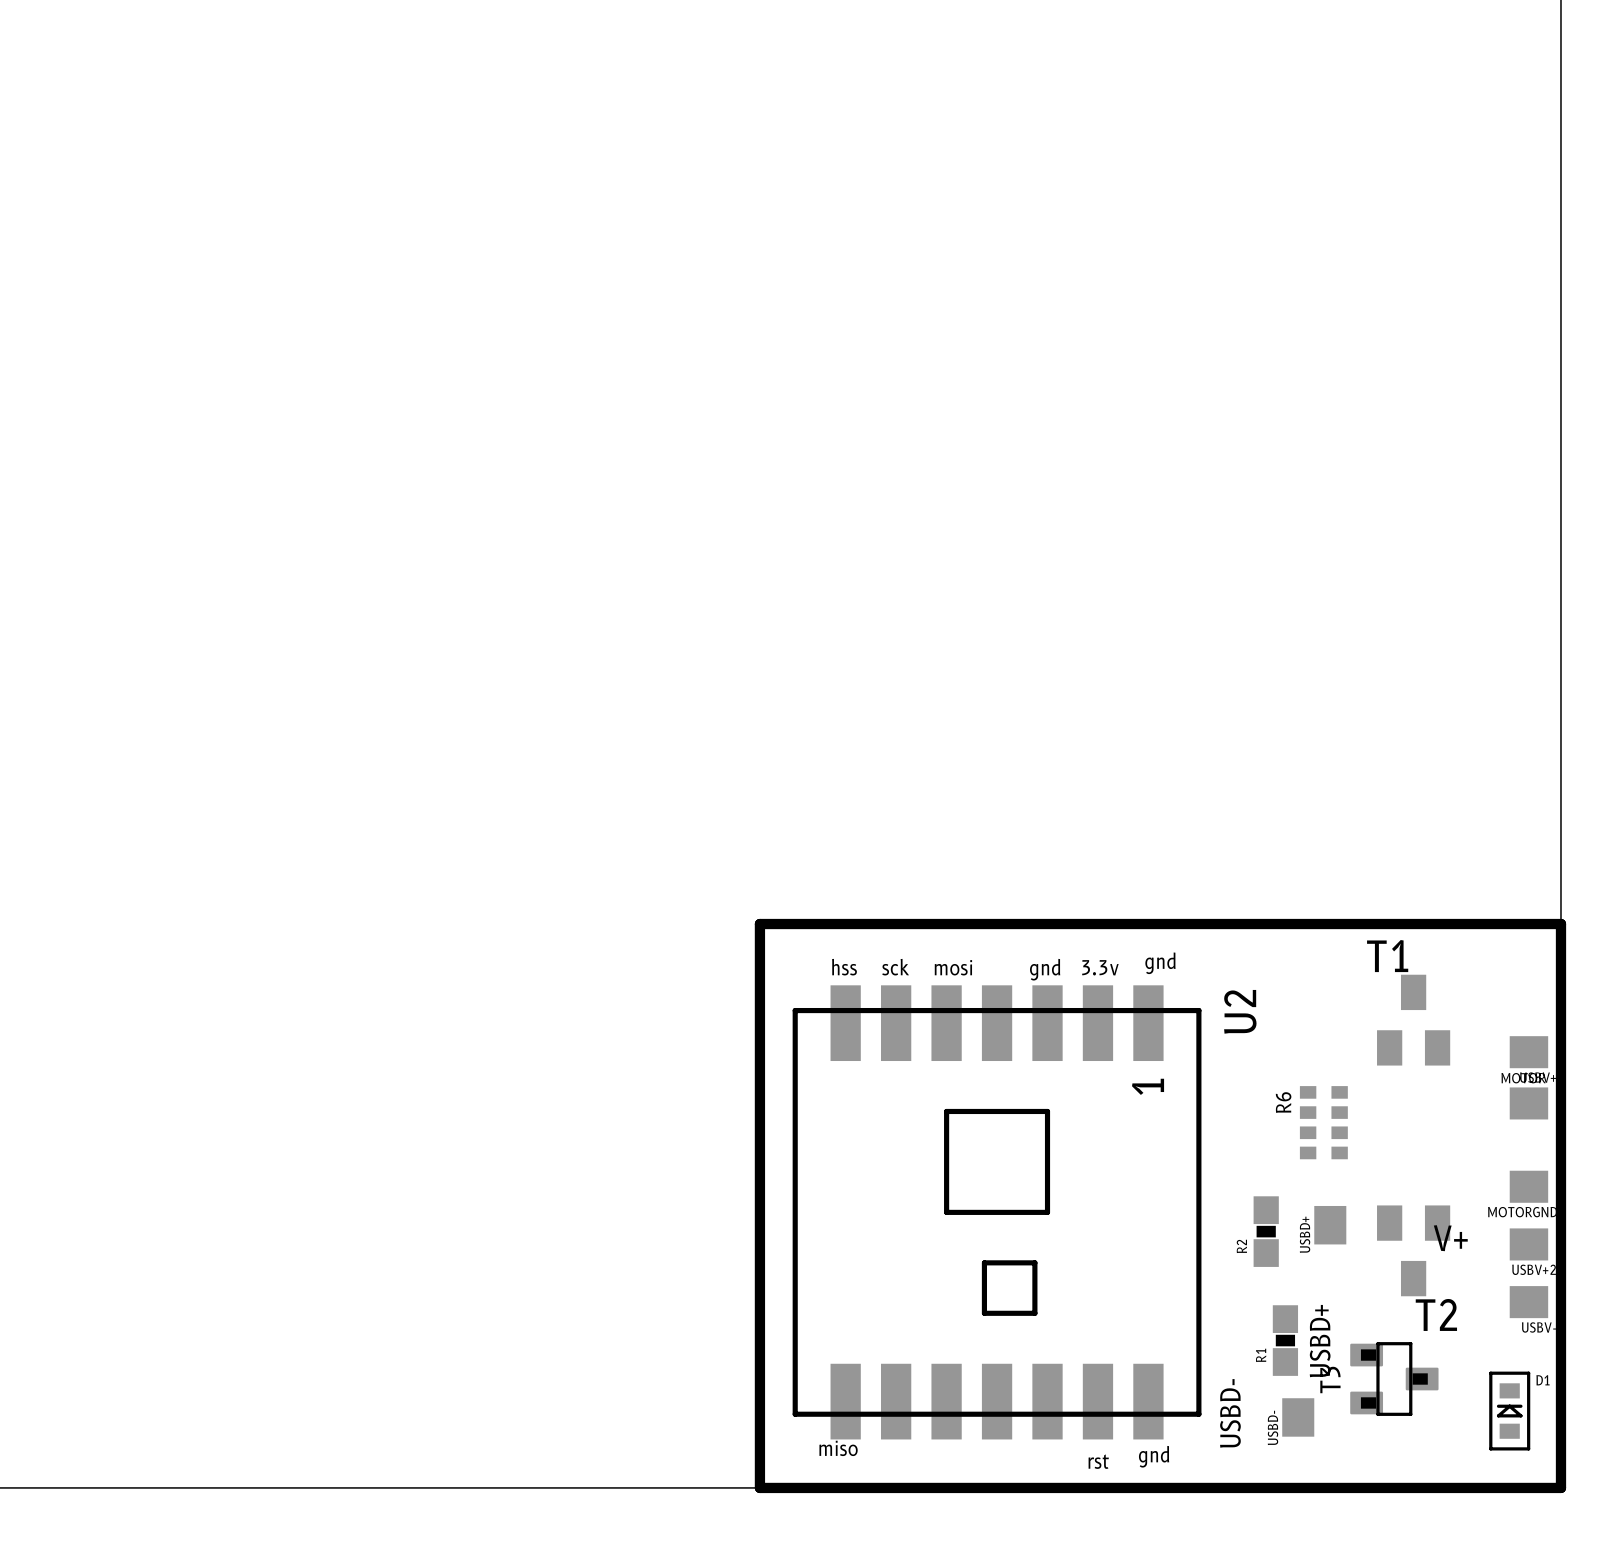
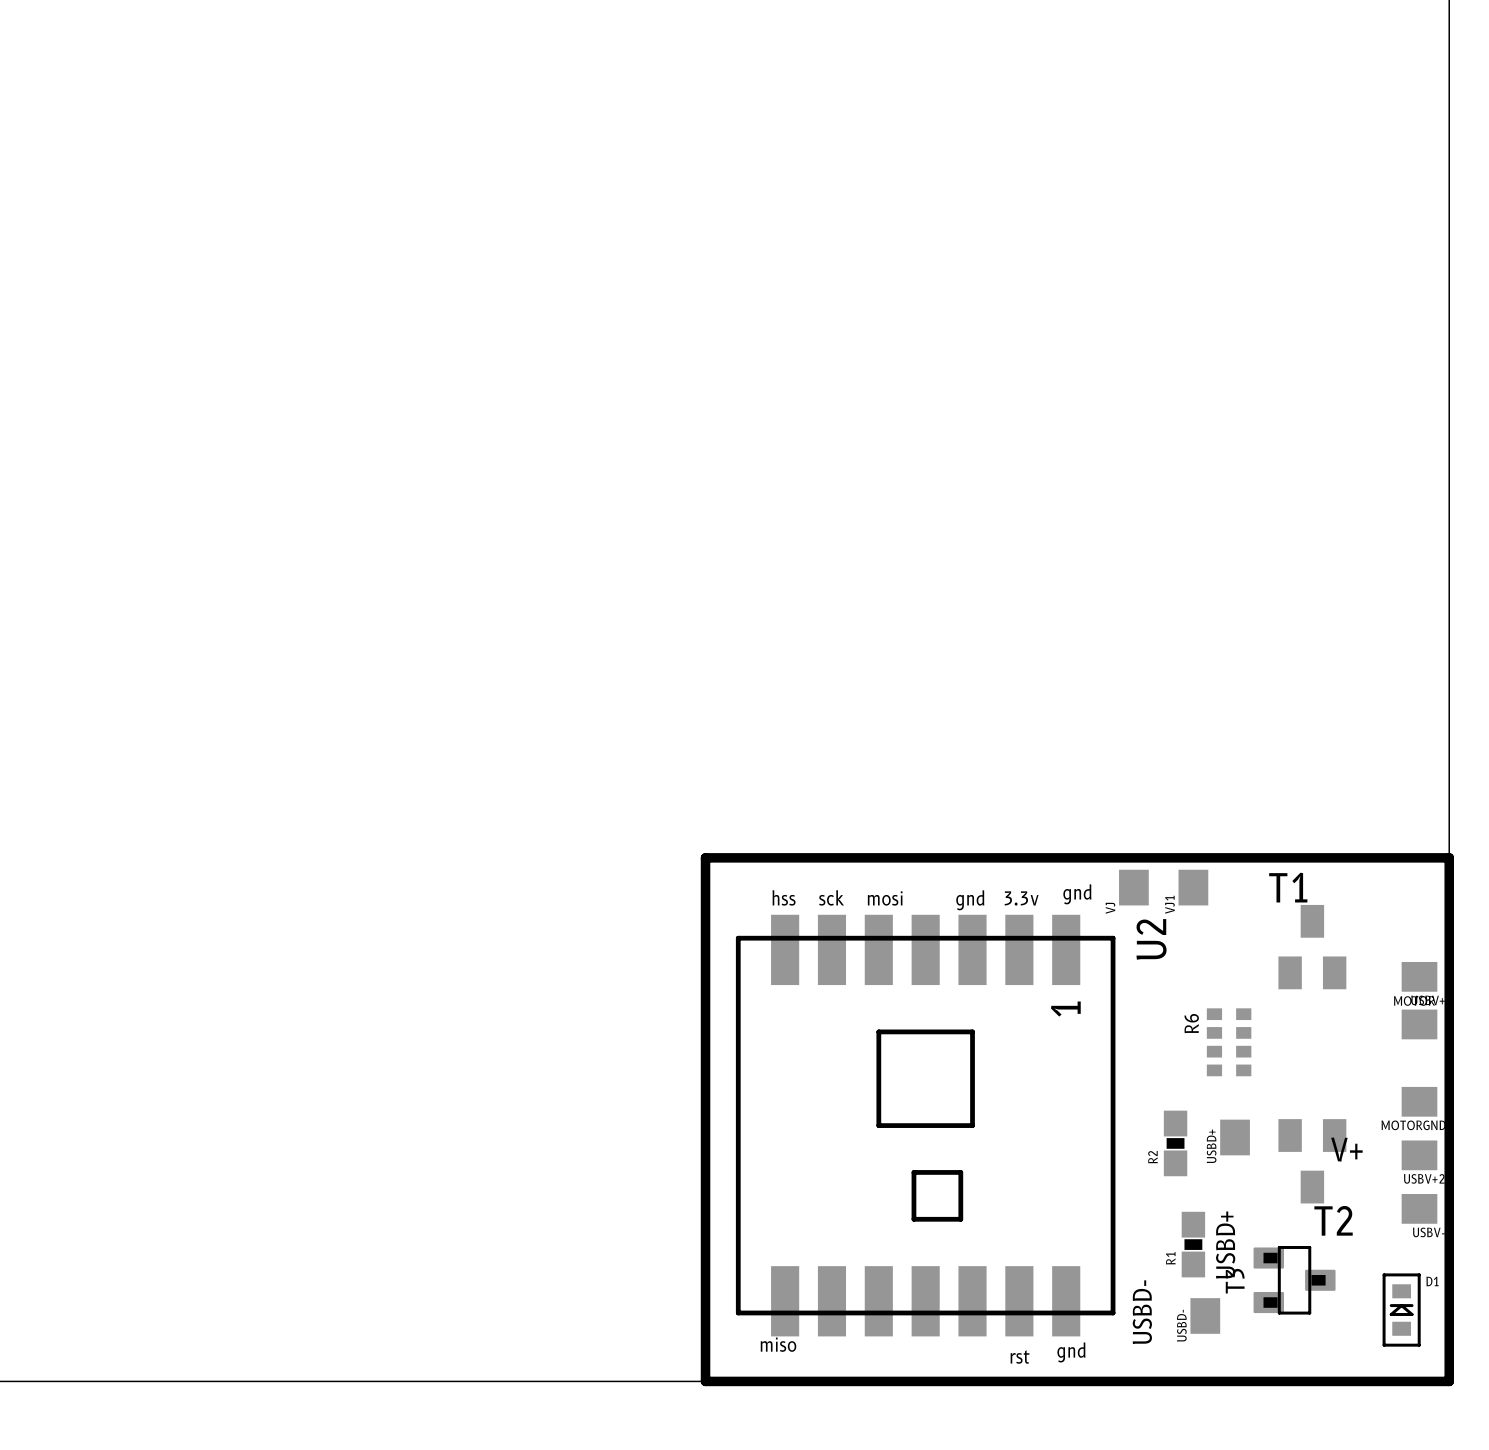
VJ: none -> (1133, 887)
VJ1: none -> (1193, 887)

